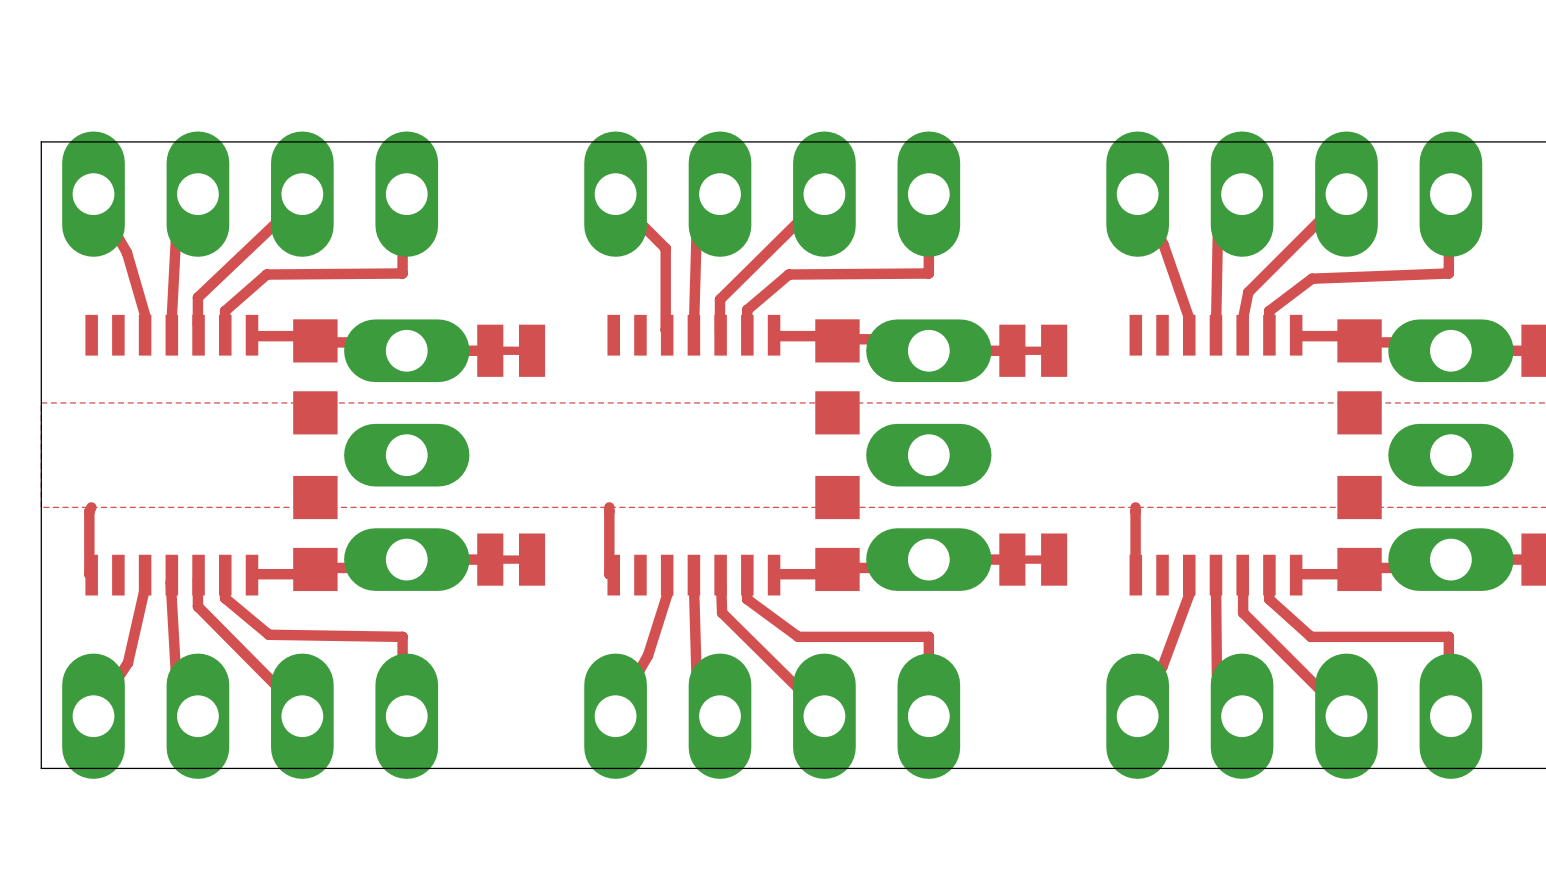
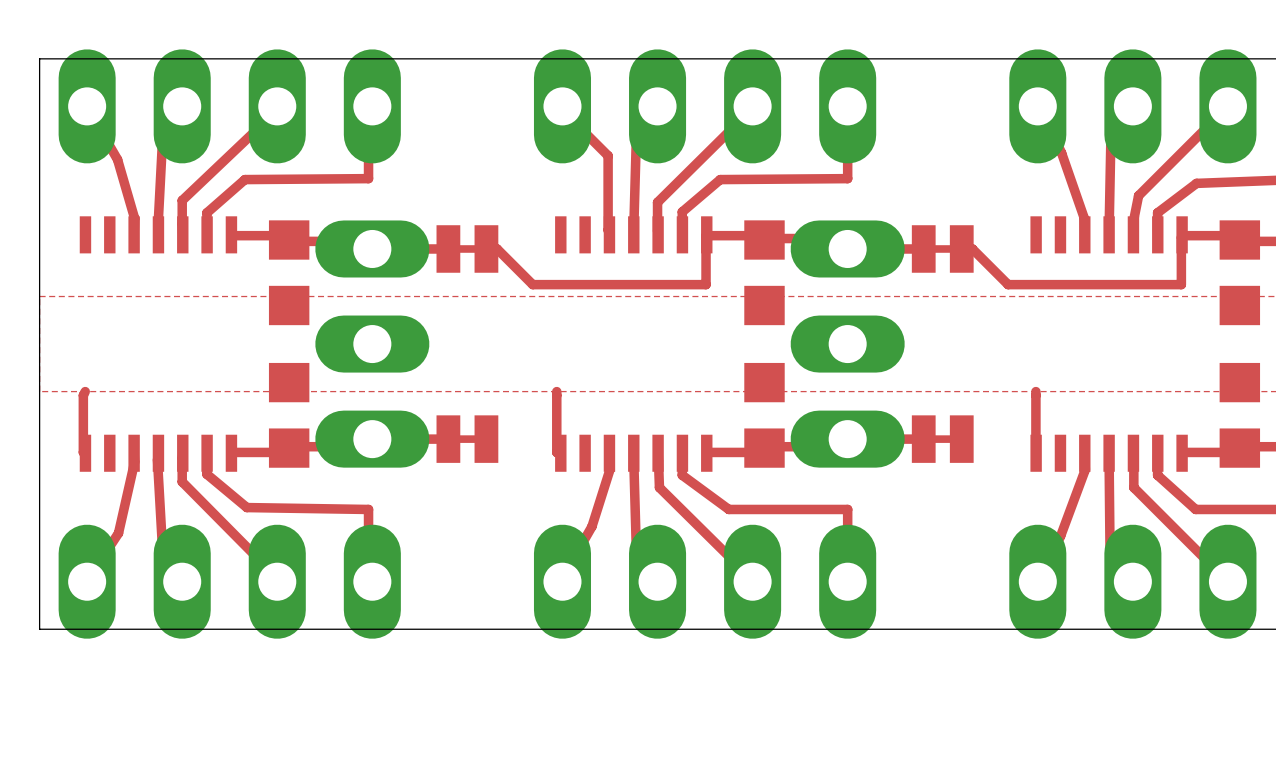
top track: none -> (706, 234) (706, 284) (532, 284) (497, 248) (486, 248)
top track: none -> (1182, 234) (1181, 284) (1008, 284) (972, 248) (961, 248)

